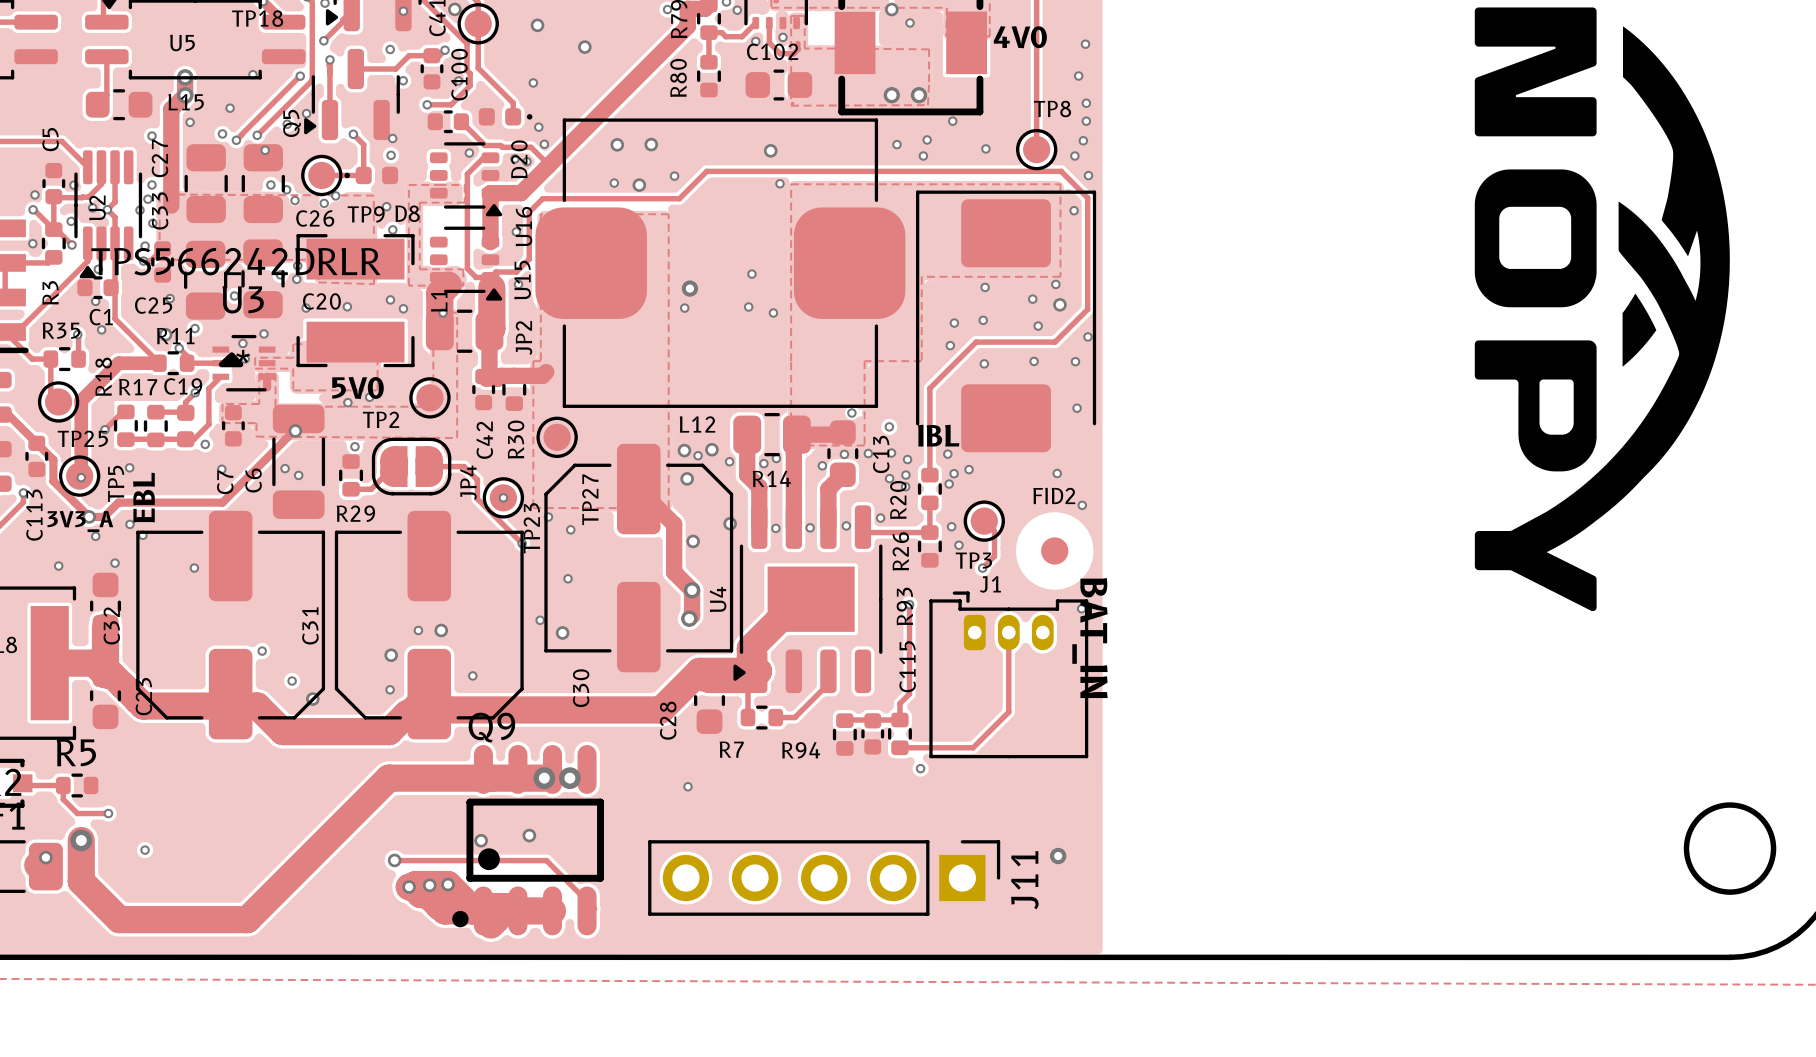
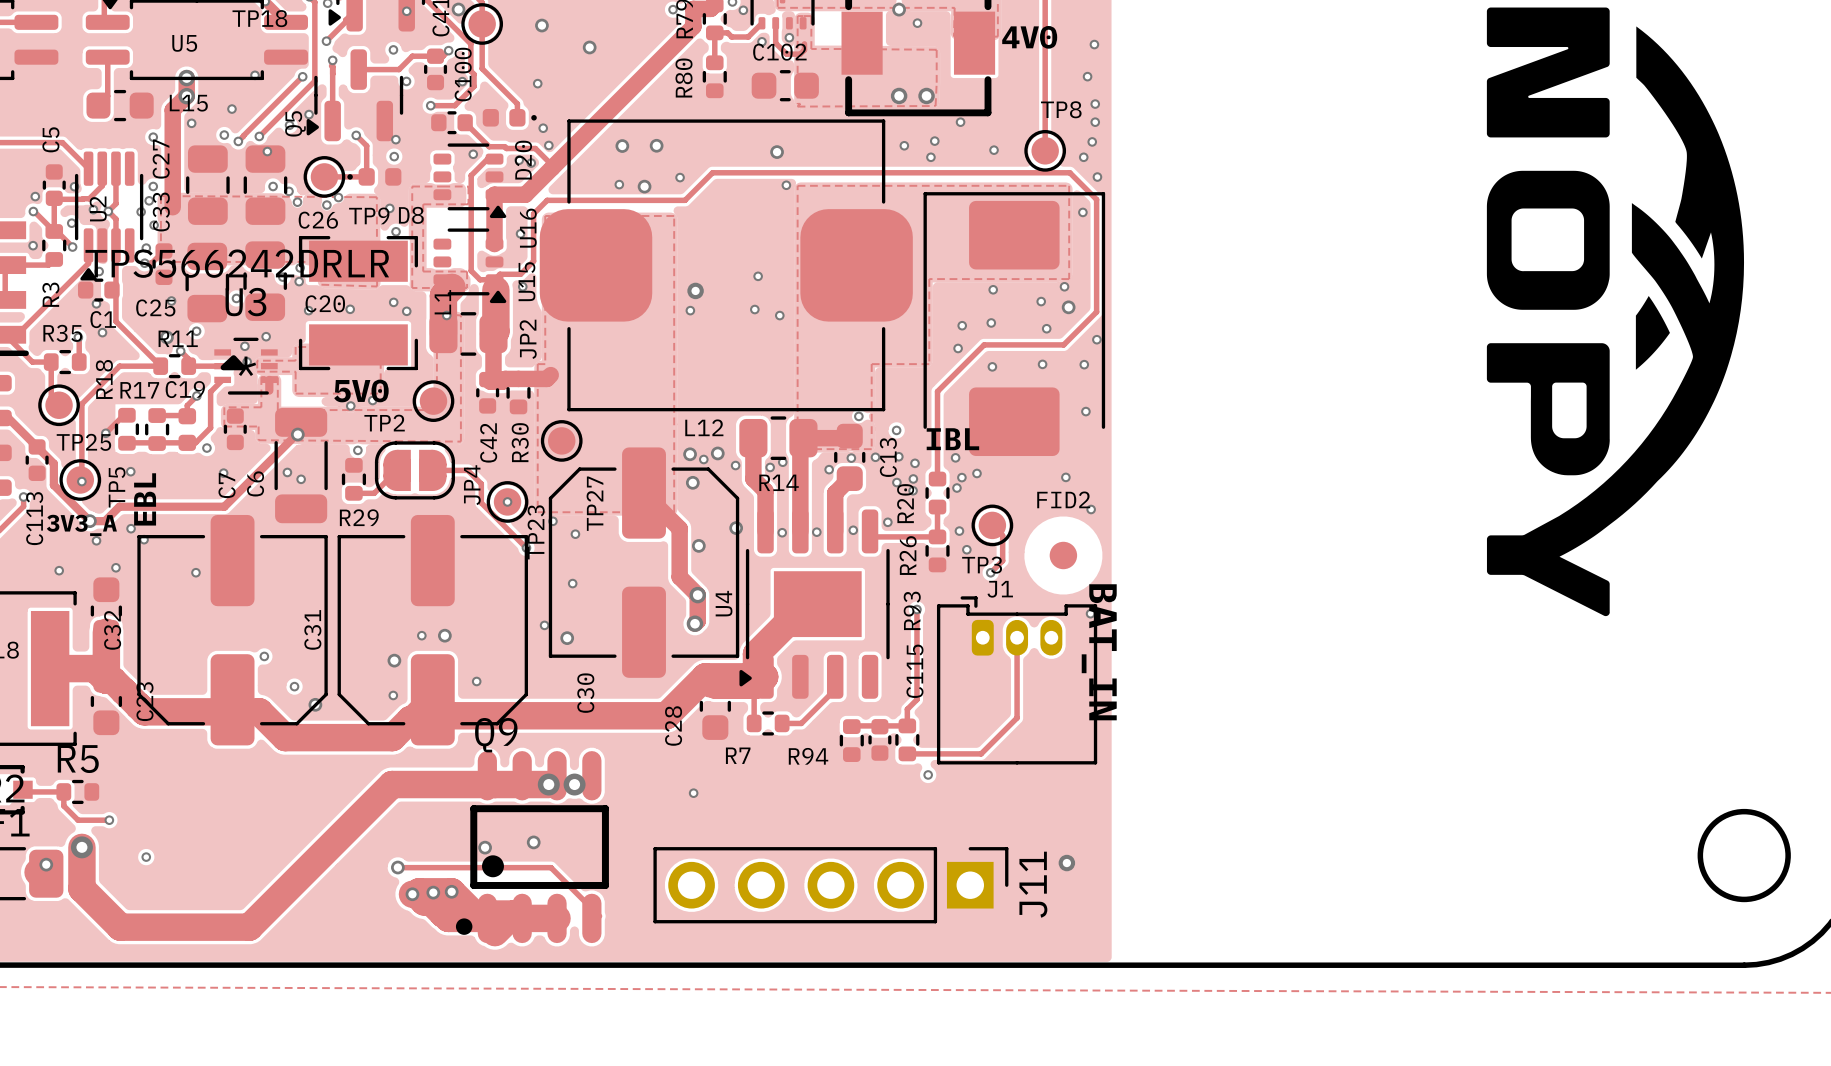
track width: thick (159, 363) (118, 363) (81, 400) (81, 477) -> thin (160, 366) (119, 366) (81, 403) (81, 481)

